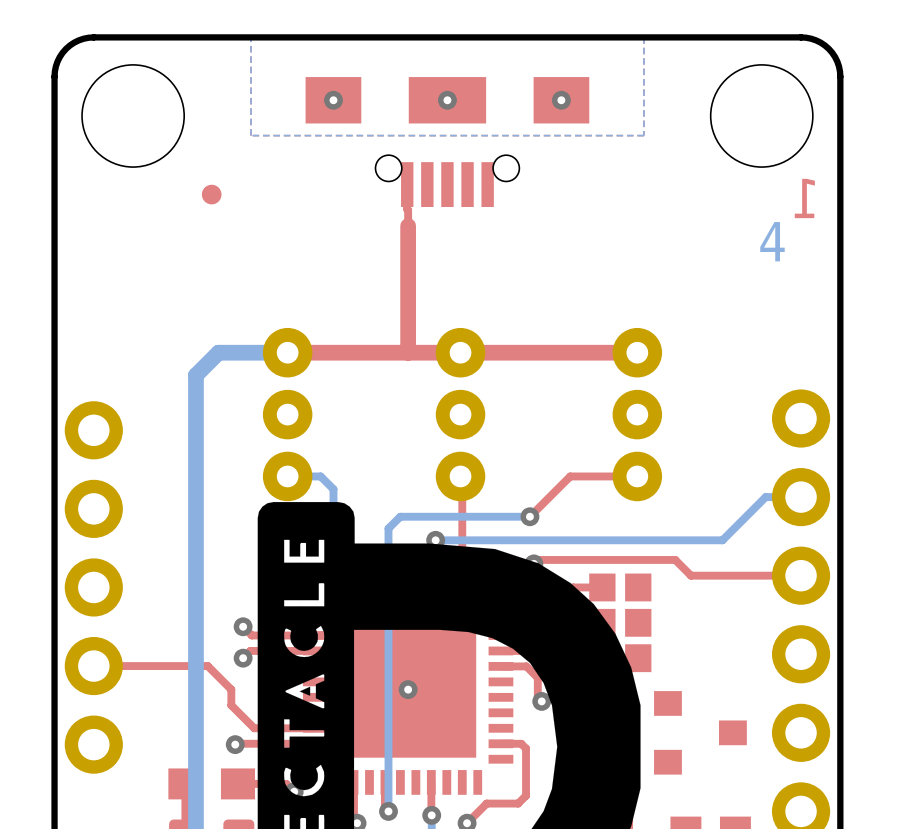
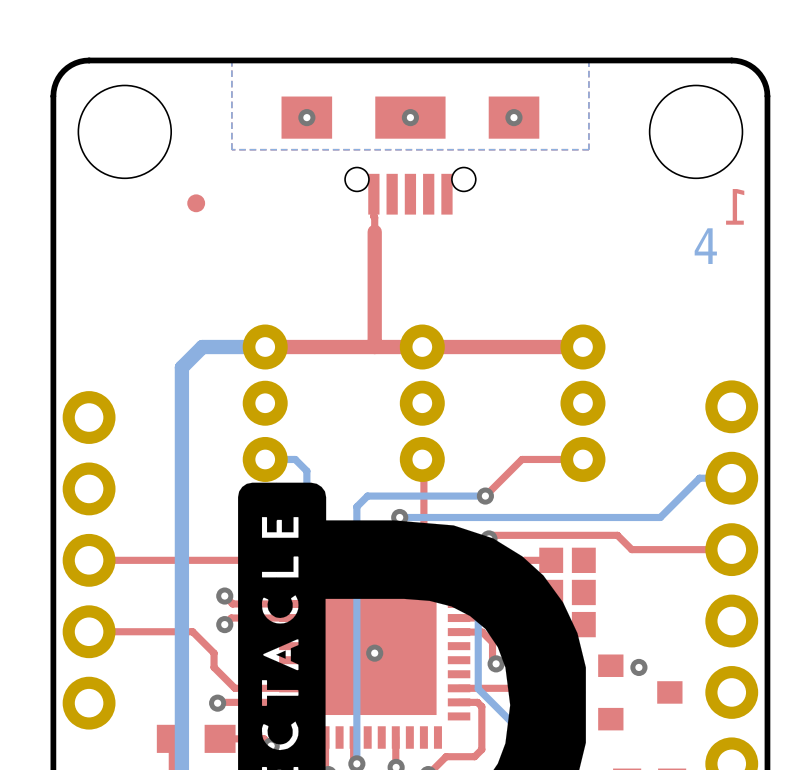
top track: none -> (256, 556) (253, 560) (89, 560)
bottom track: none -> (478, 563) (478, 688) (510, 721)
via: none -> (638, 667)
top track: none -> (459, 688) (517, 688)

